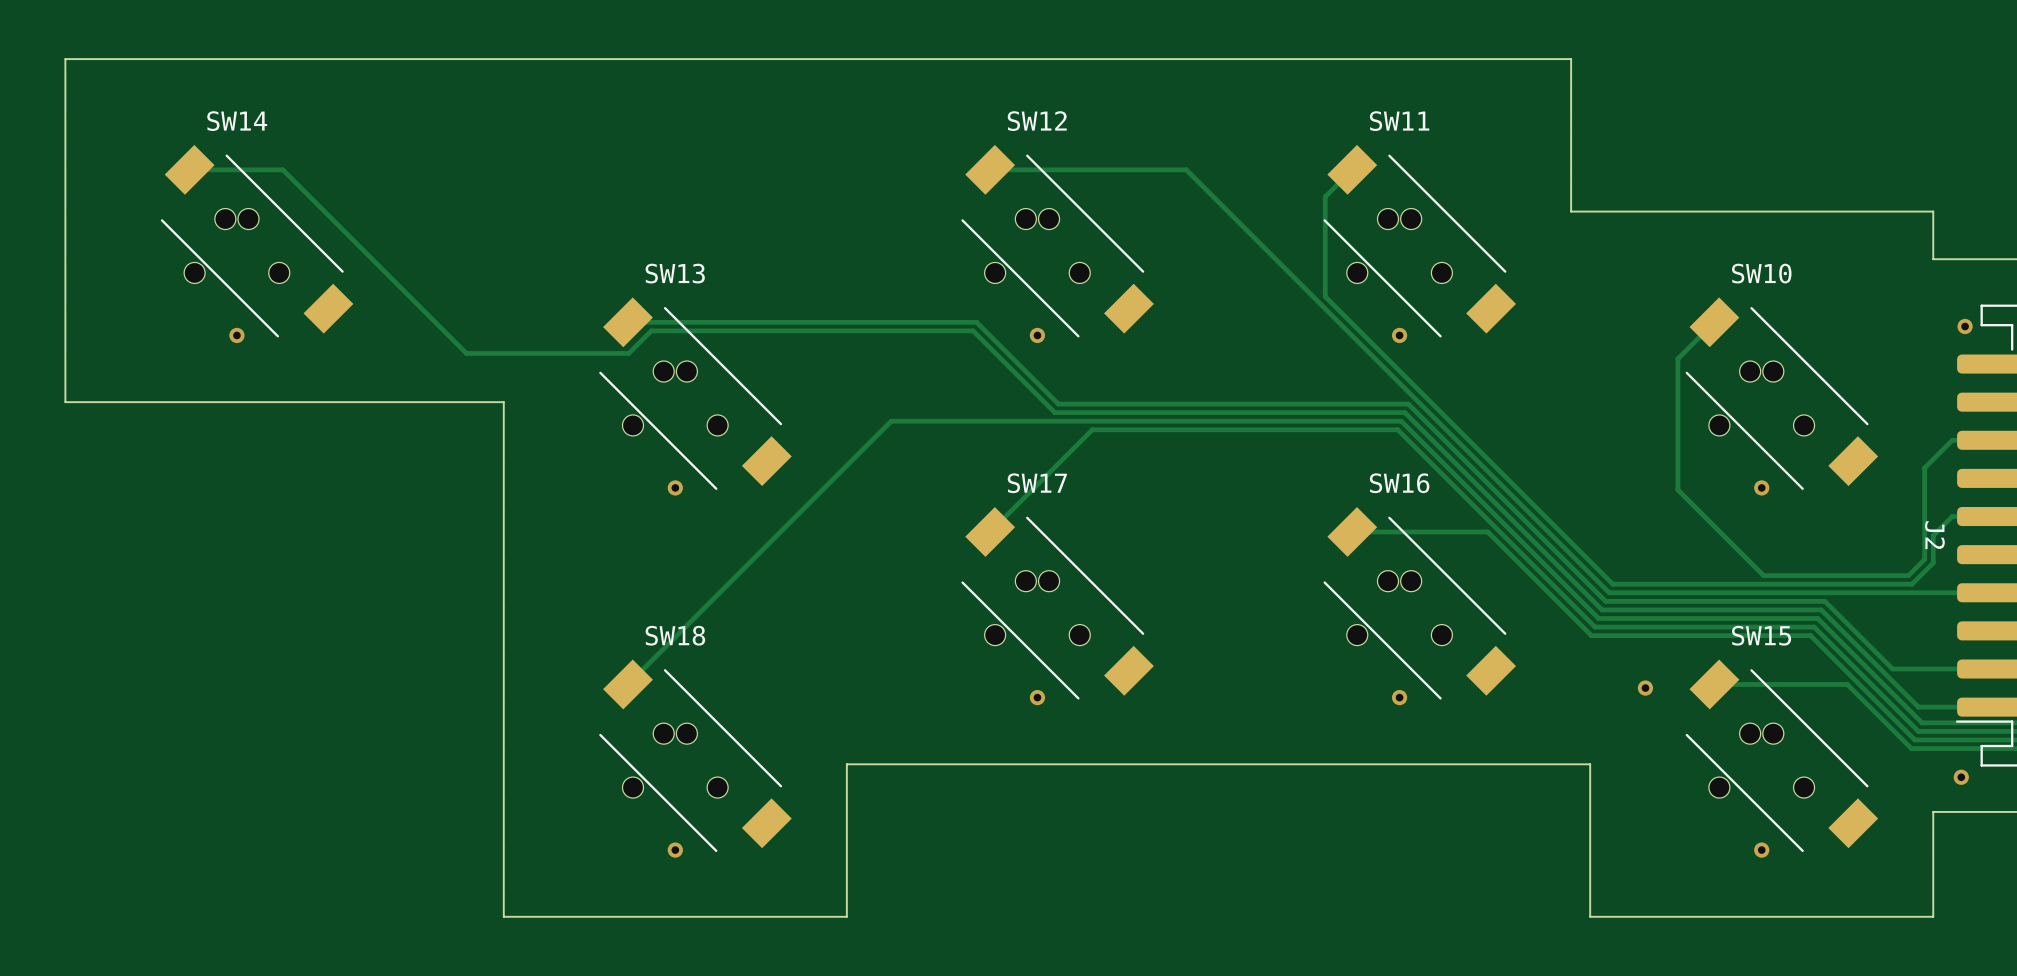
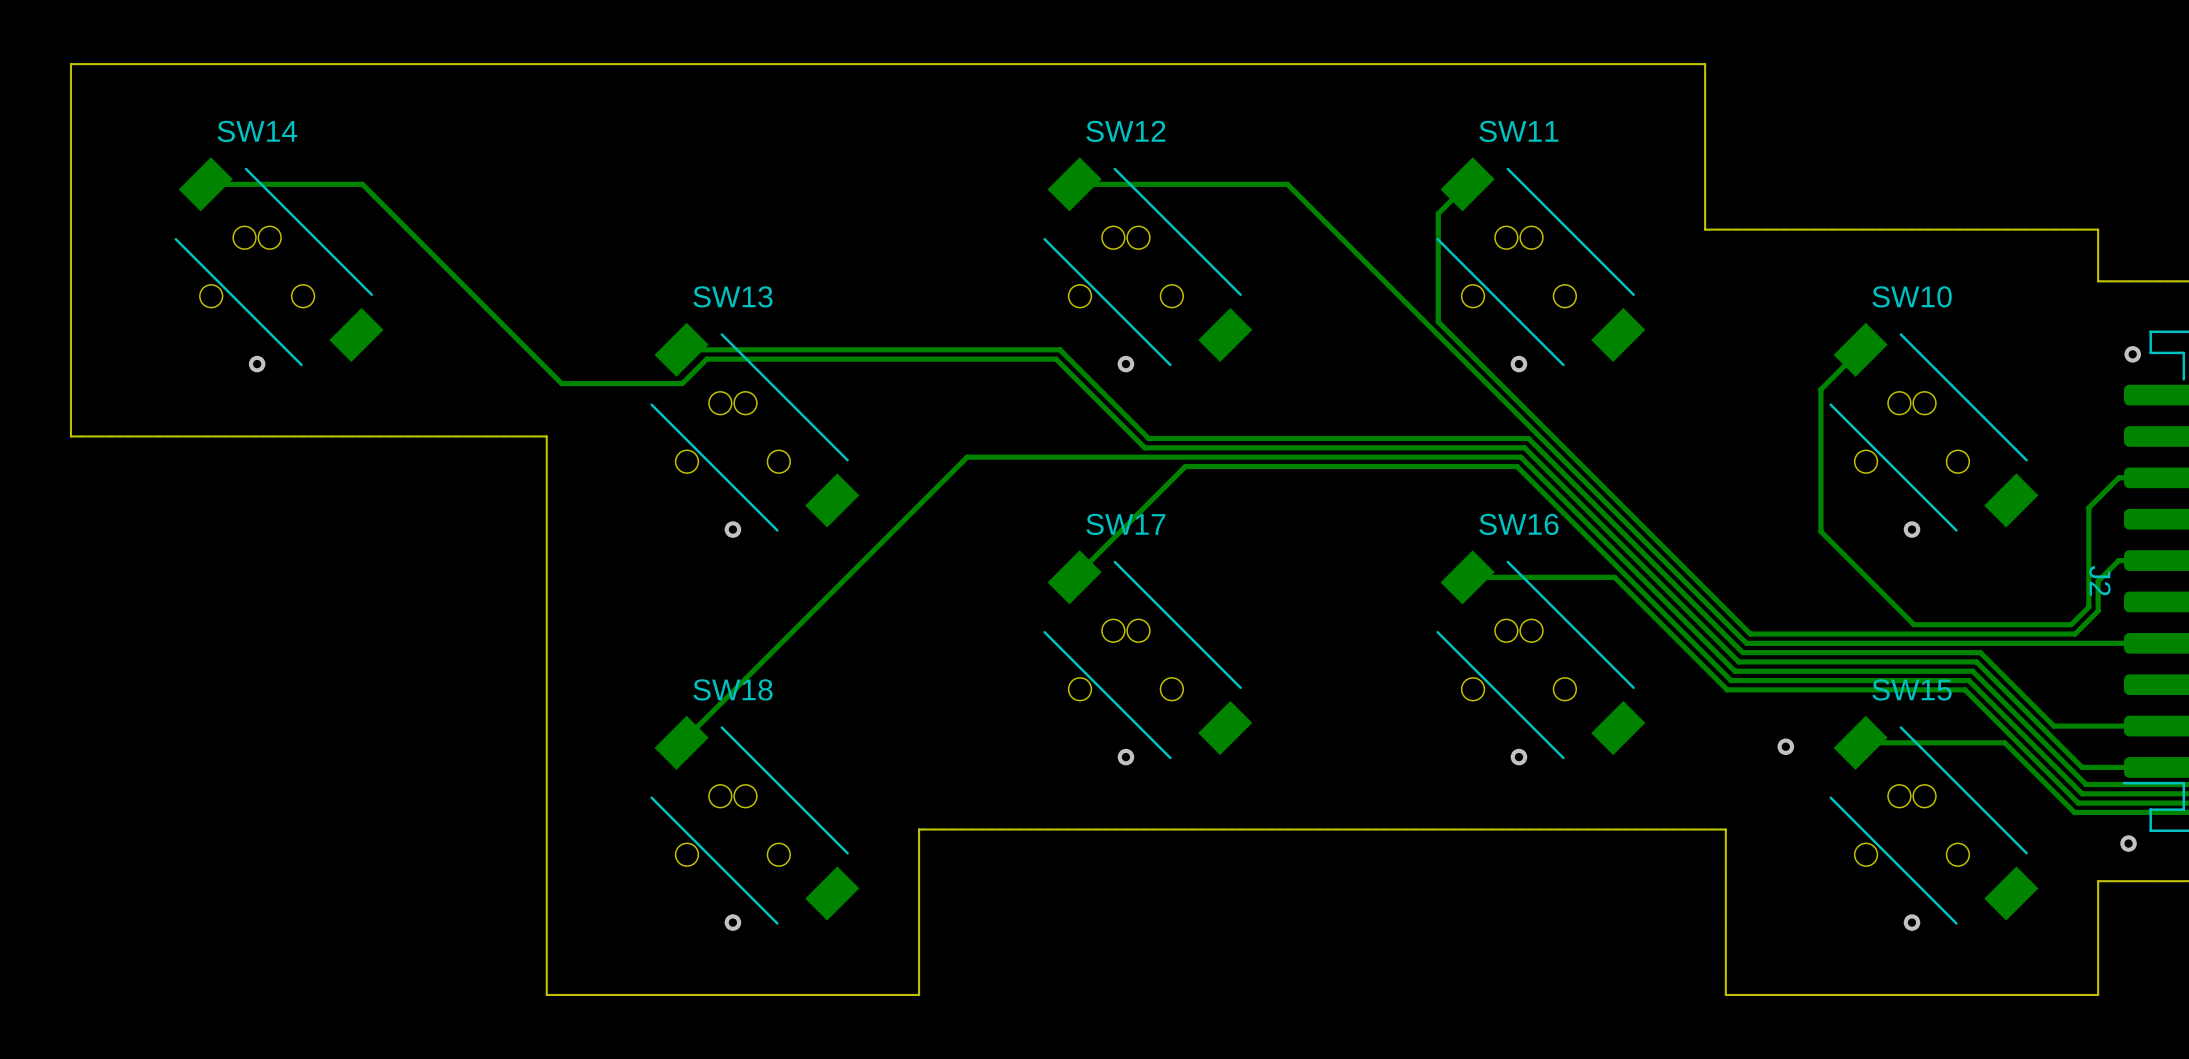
track: (282, 169) (466, 353) (517, 353) -> (307, 184) (362, 184) (561, 383)

